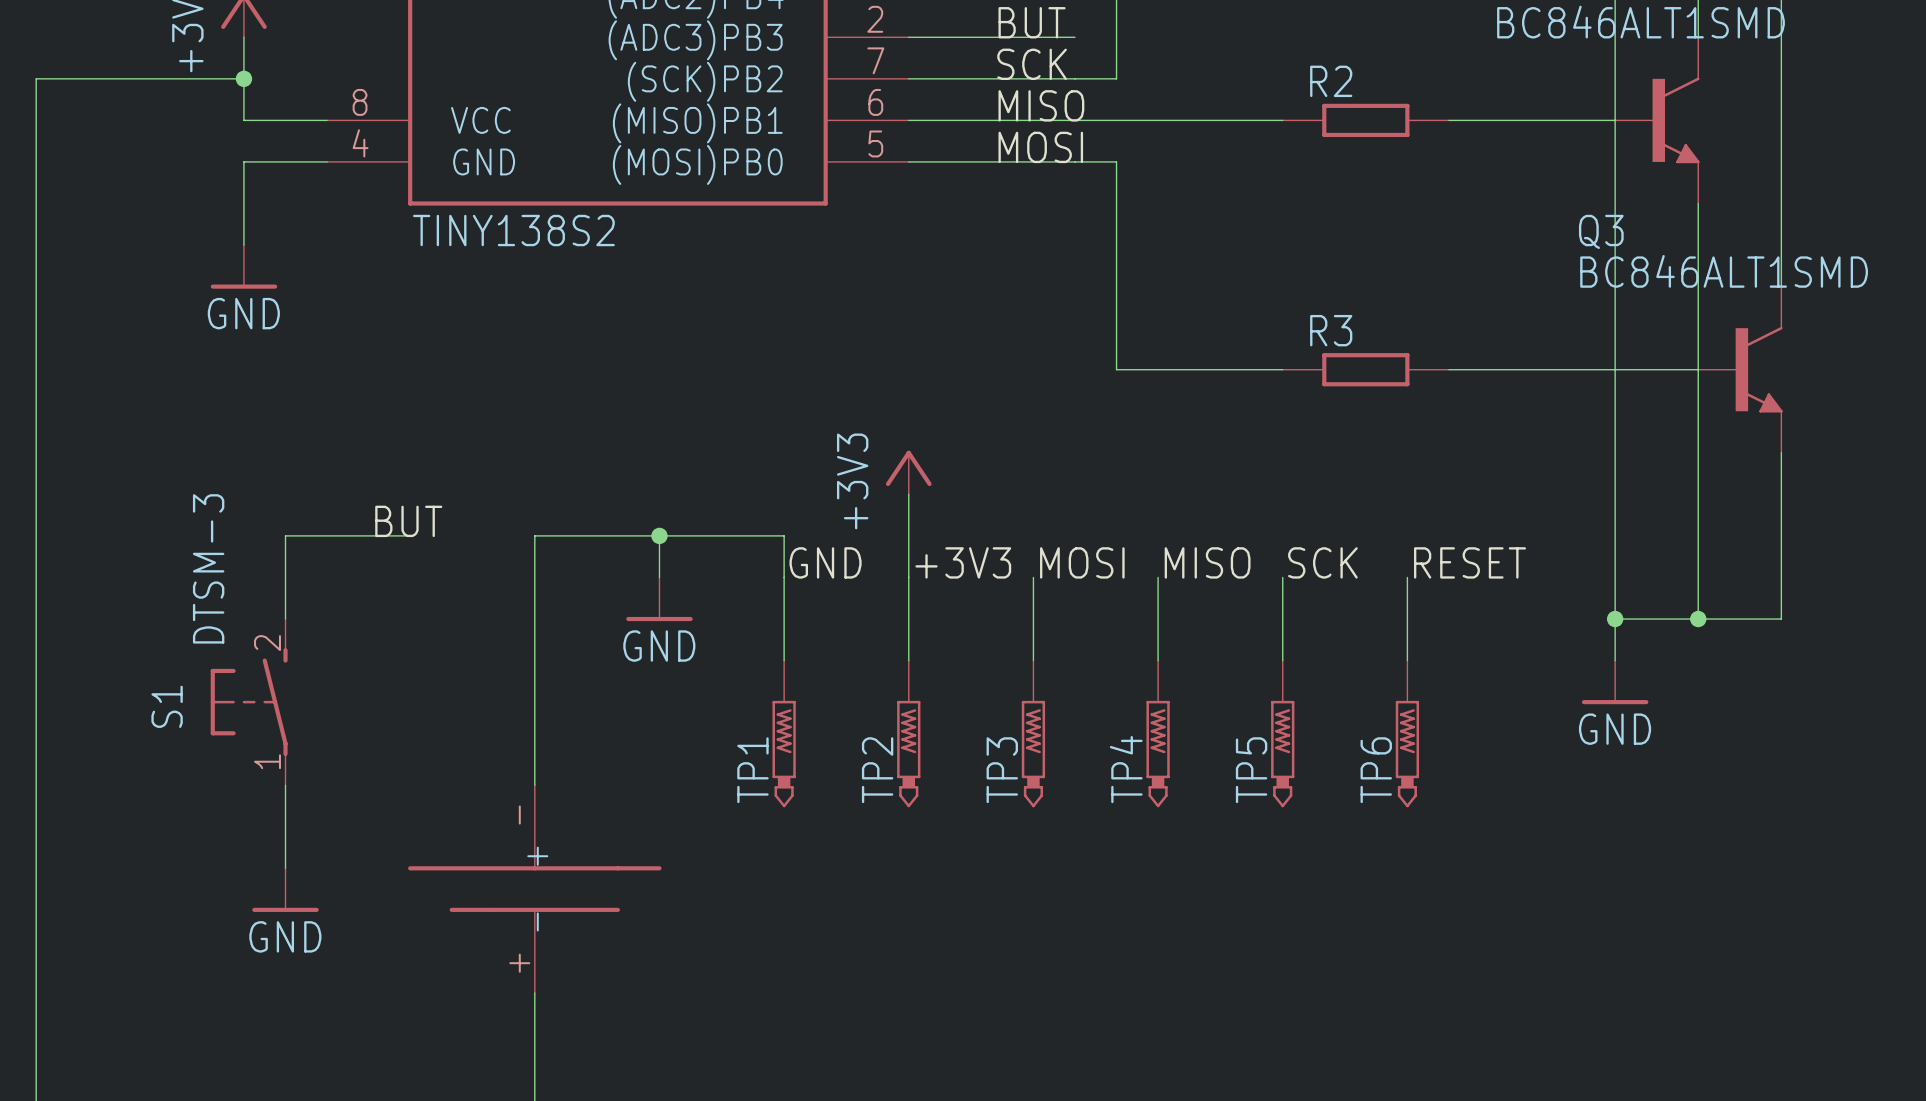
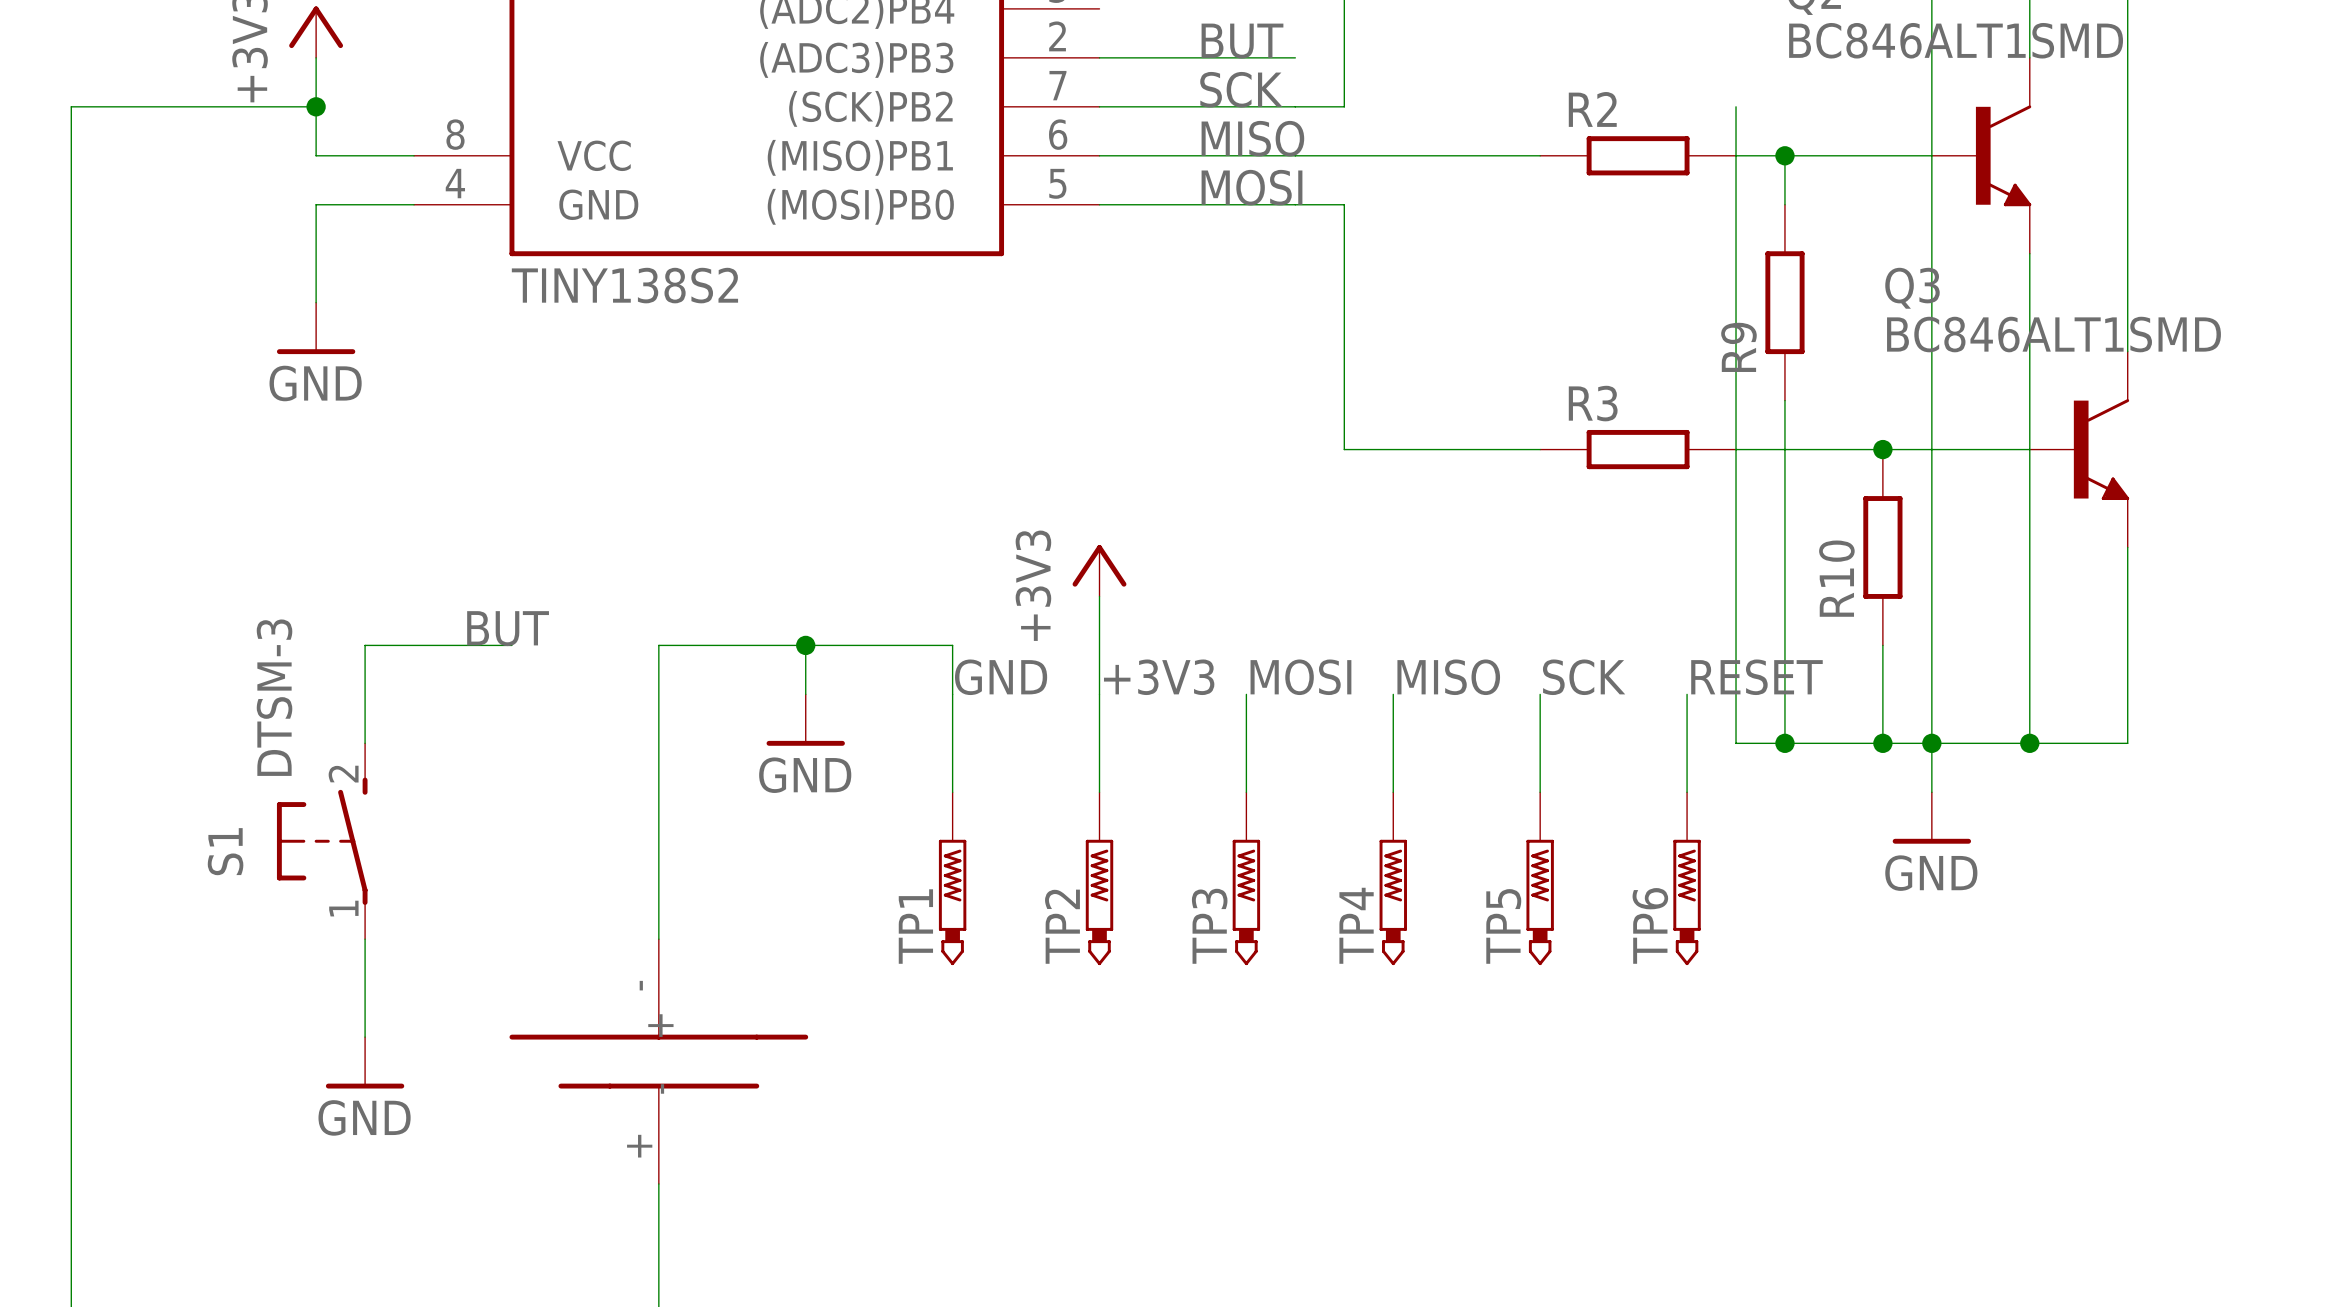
wire: none -> (1736, 106) (1736, 743) (1931, 743)
wire: none -> (1784, 155) (1784, 204)
junction: none -> (1784, 155)
R9: none -> (1784, 302)
wire: none -> (1784, 400) (1784, 743)
junction: none -> (1882, 449)
R10: none -> (1882, 547)
wire: none -> (1882, 645) (1882, 743)
junction: none -> (1784, 743)
junction: none -> (1882, 743)

